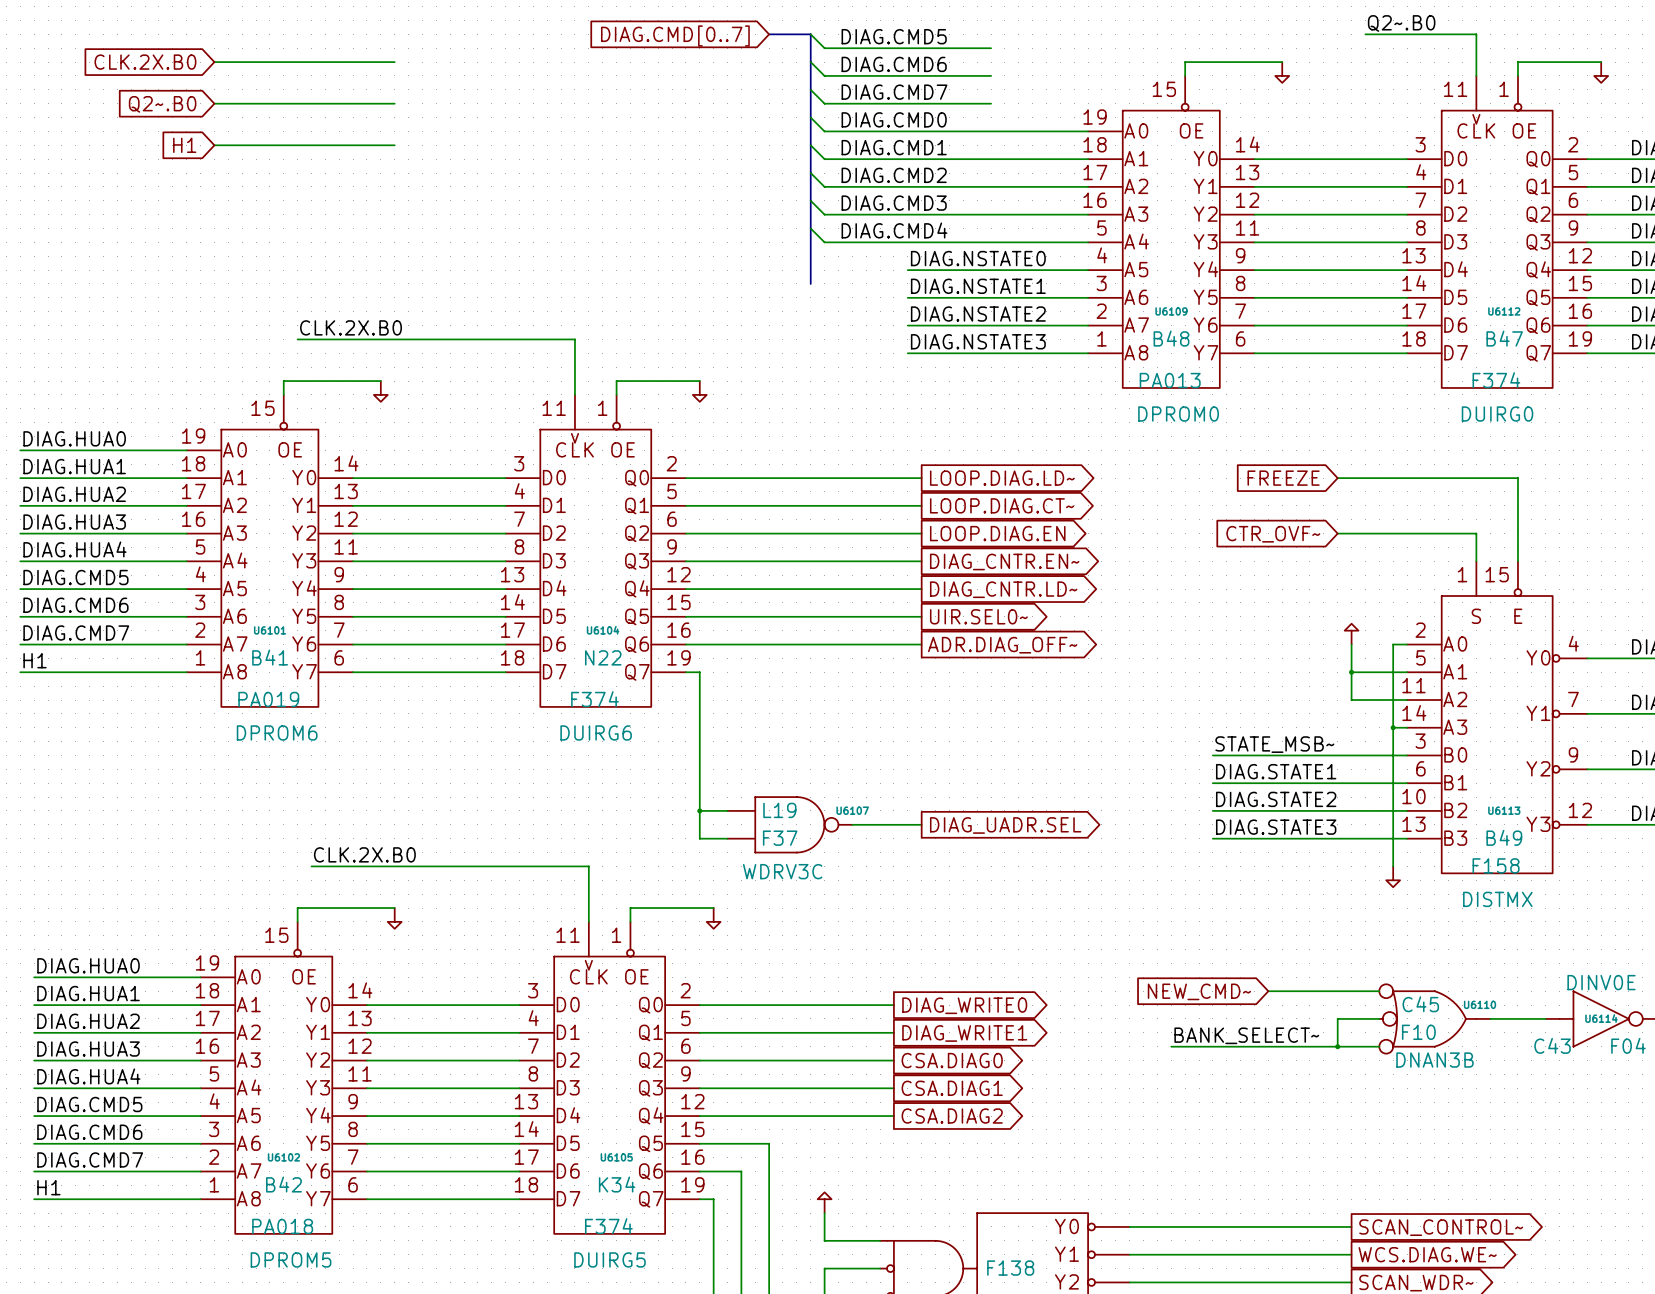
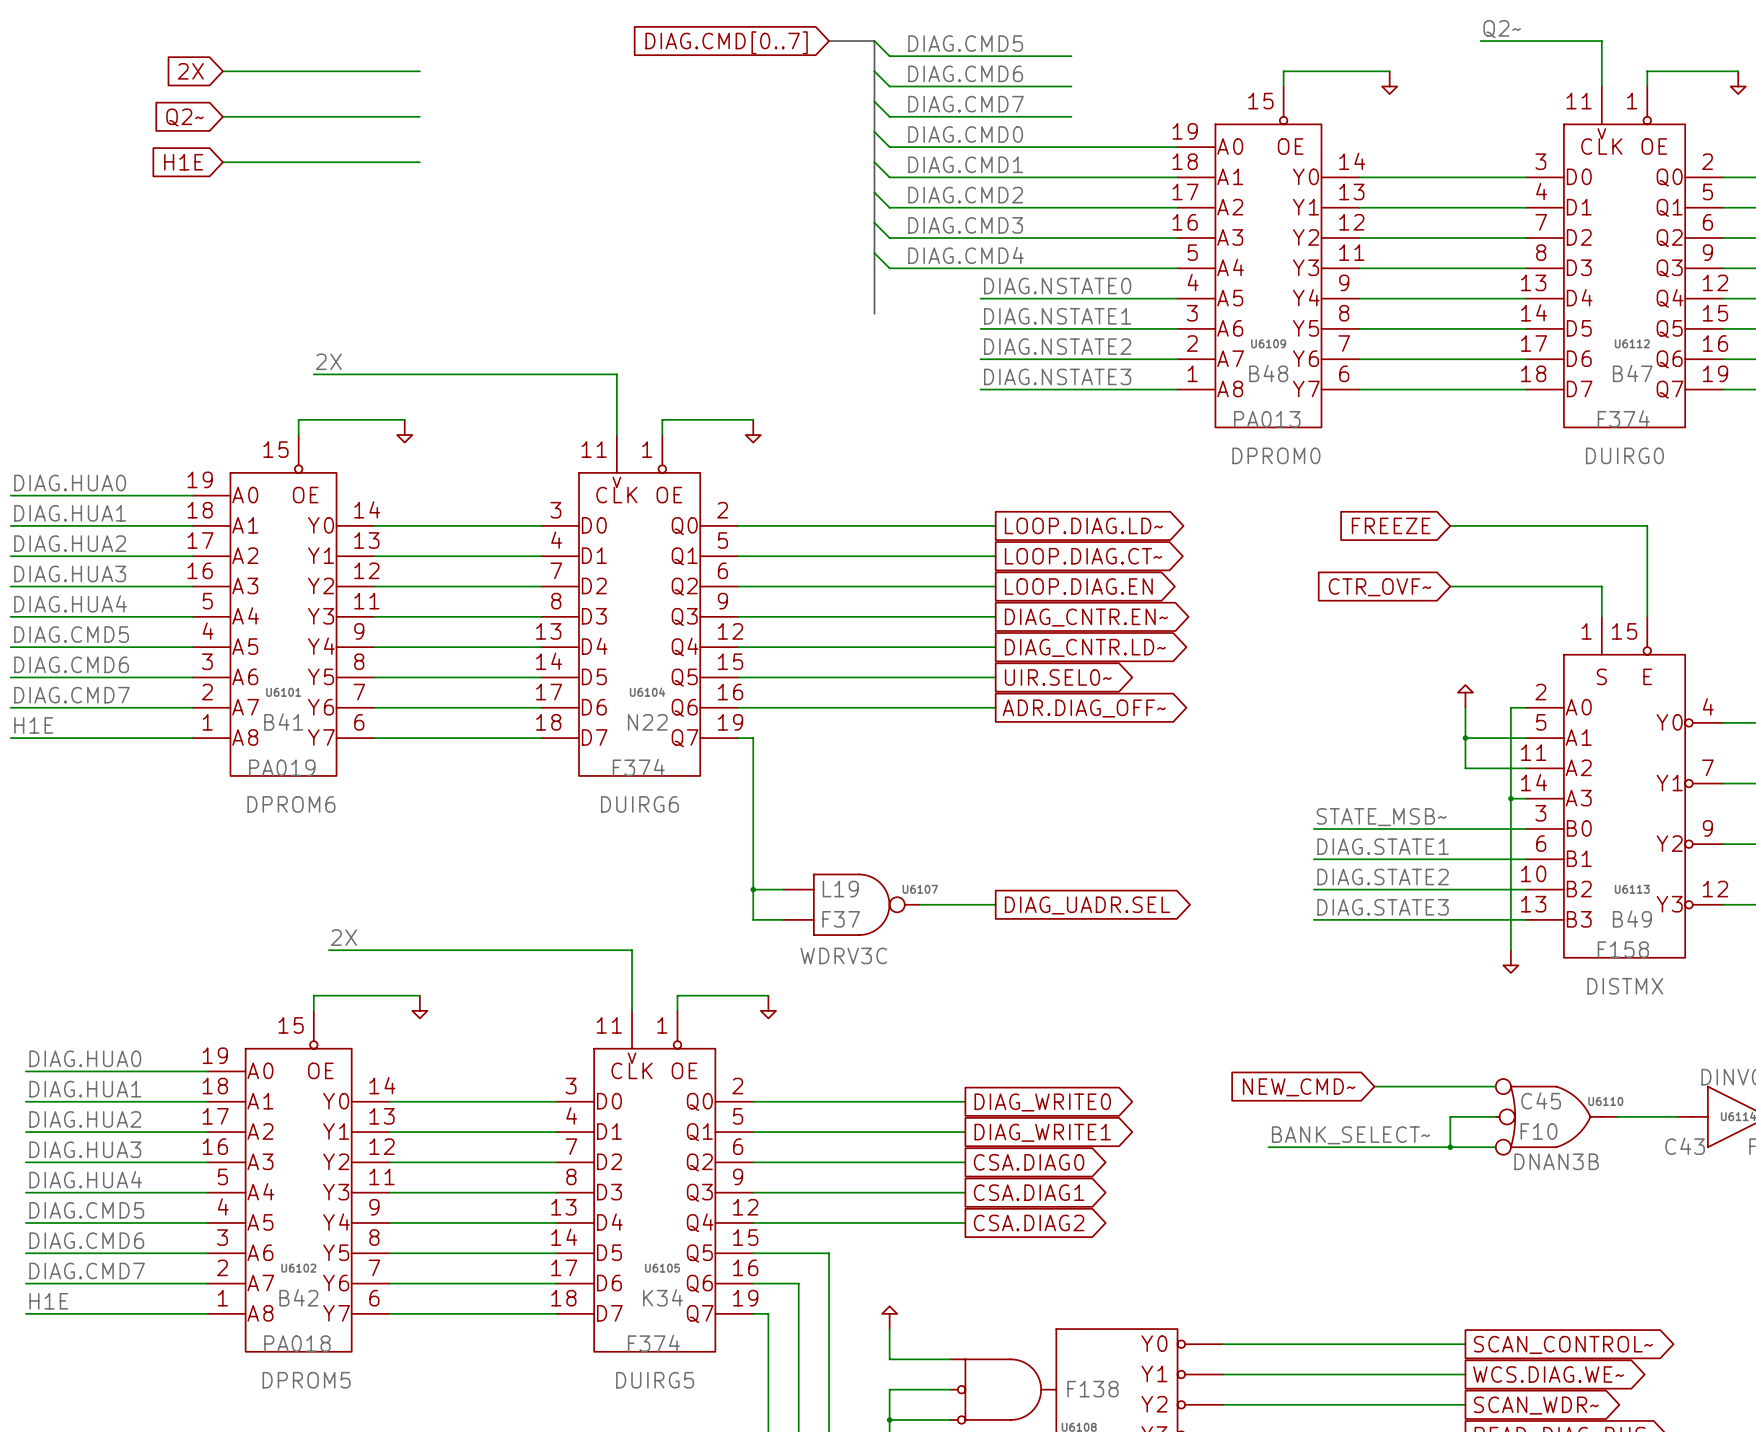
label: Q2~.B0 (1401, 23) -> Q2~ (1502, 29)
global label: CLK.2X.B0 (145, 62) -> 2X (190, 71)
global label: Q2~.B0 (162, 104) -> Q2~ (185, 117)
global label: H1 (184, 145) -> H1E (183, 162)
label: CLK.2X.B0 (351, 327) -> 2X (328, 361)
label: H1 (35, 660) -> H1E (33, 725)
label: CLK.2X.B0 (364, 854) -> 2X (343, 937)
label: H1 (48, 1187) -> H1E (48, 1301)

